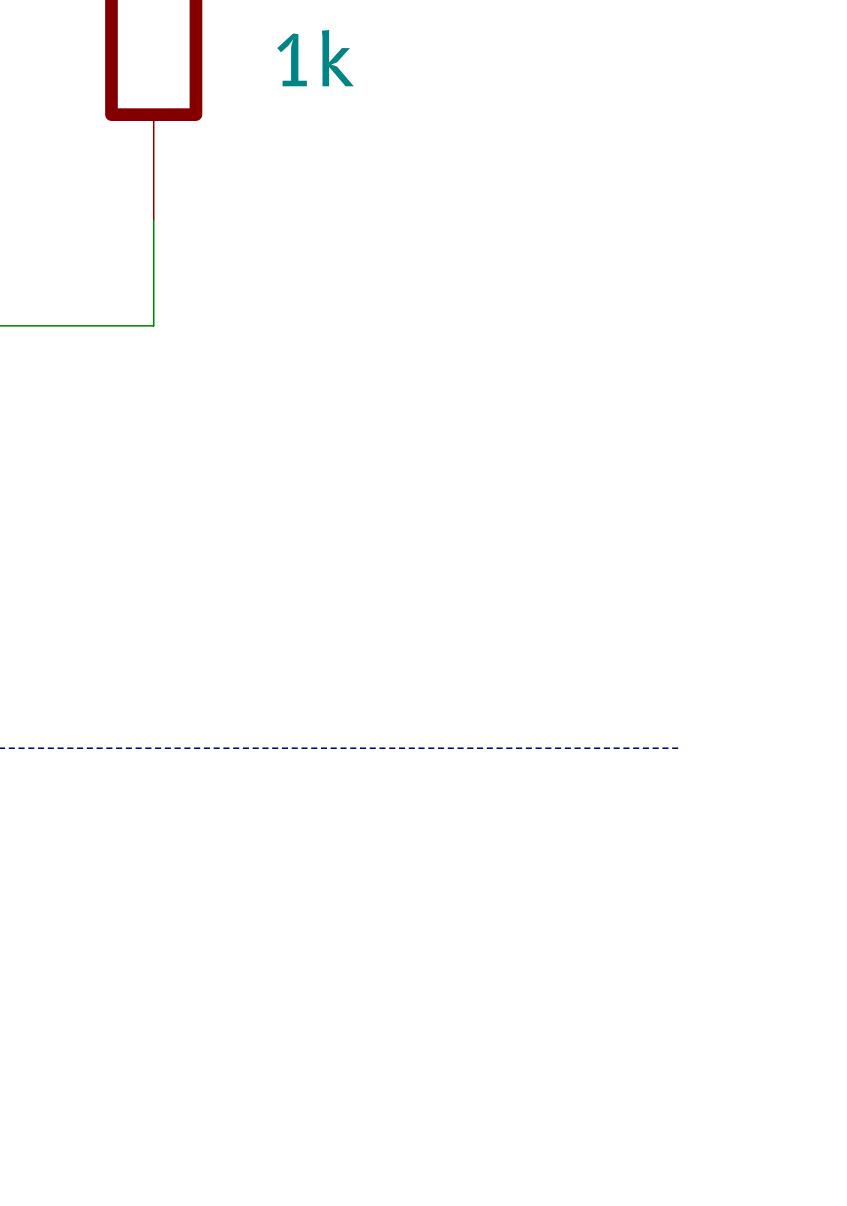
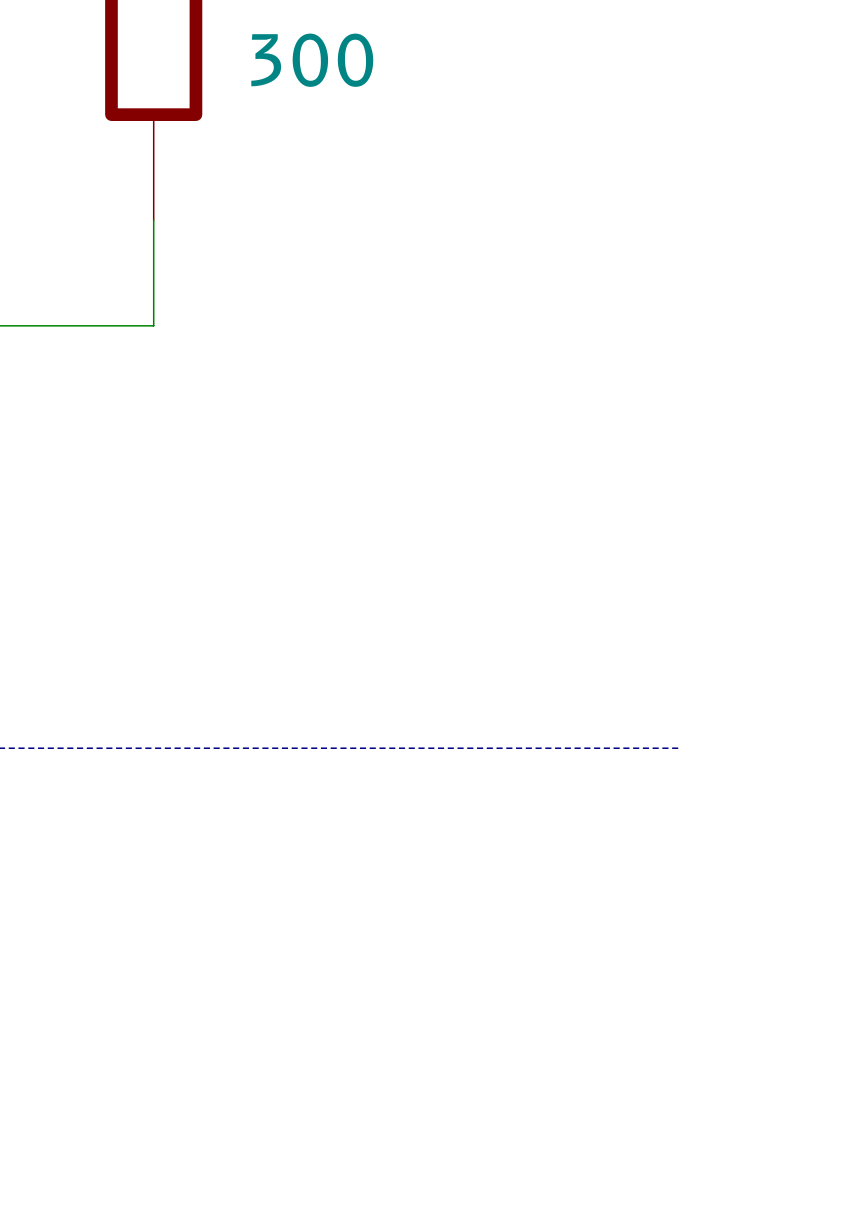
part value: 1k (315, 58) -> 300 (312, 60)

